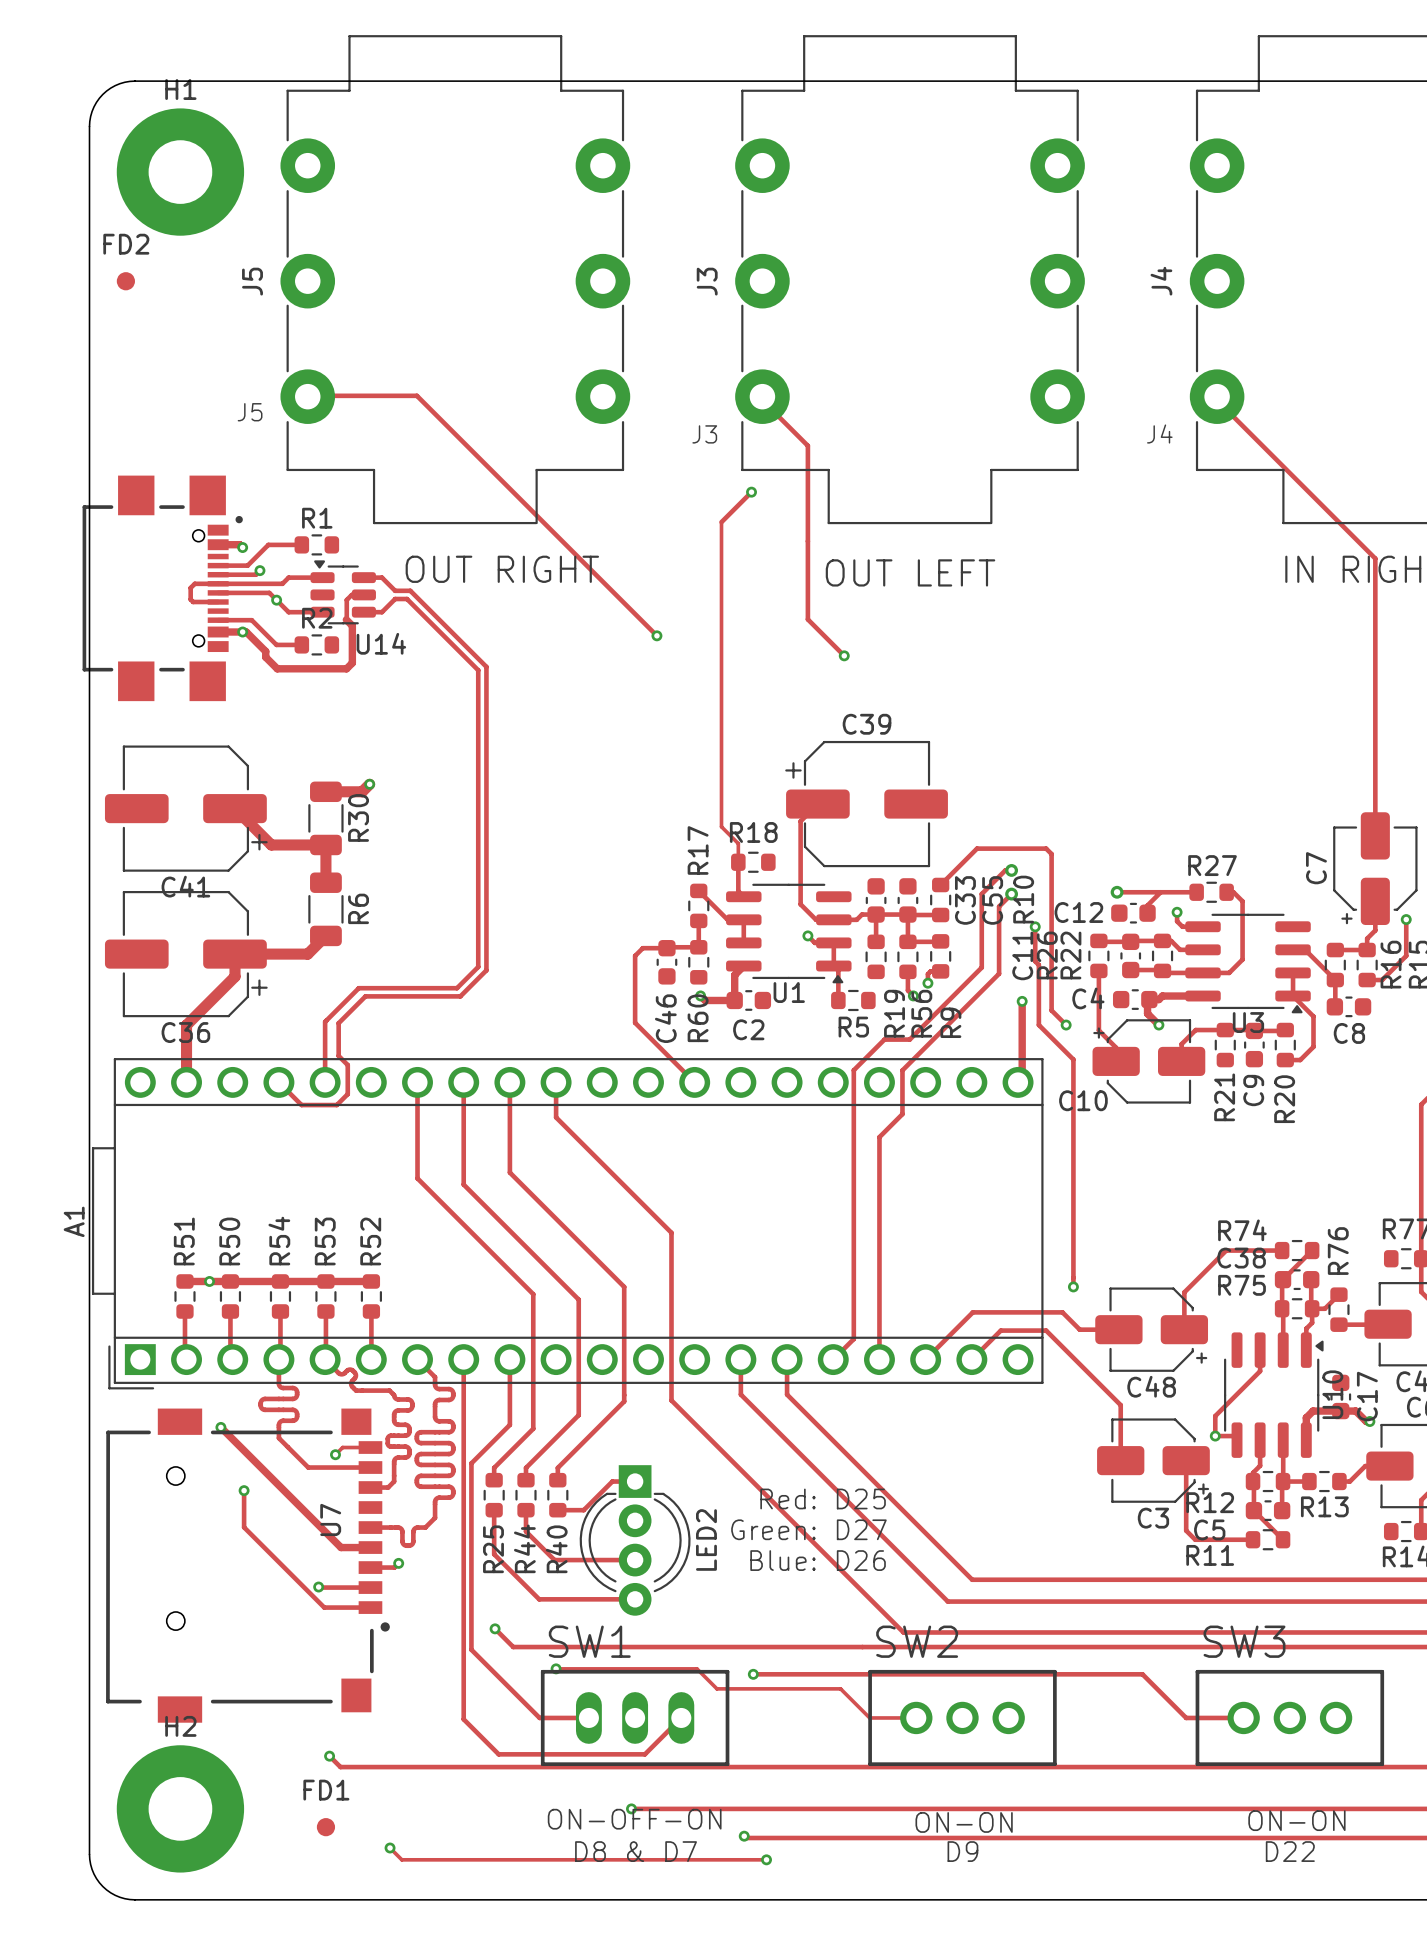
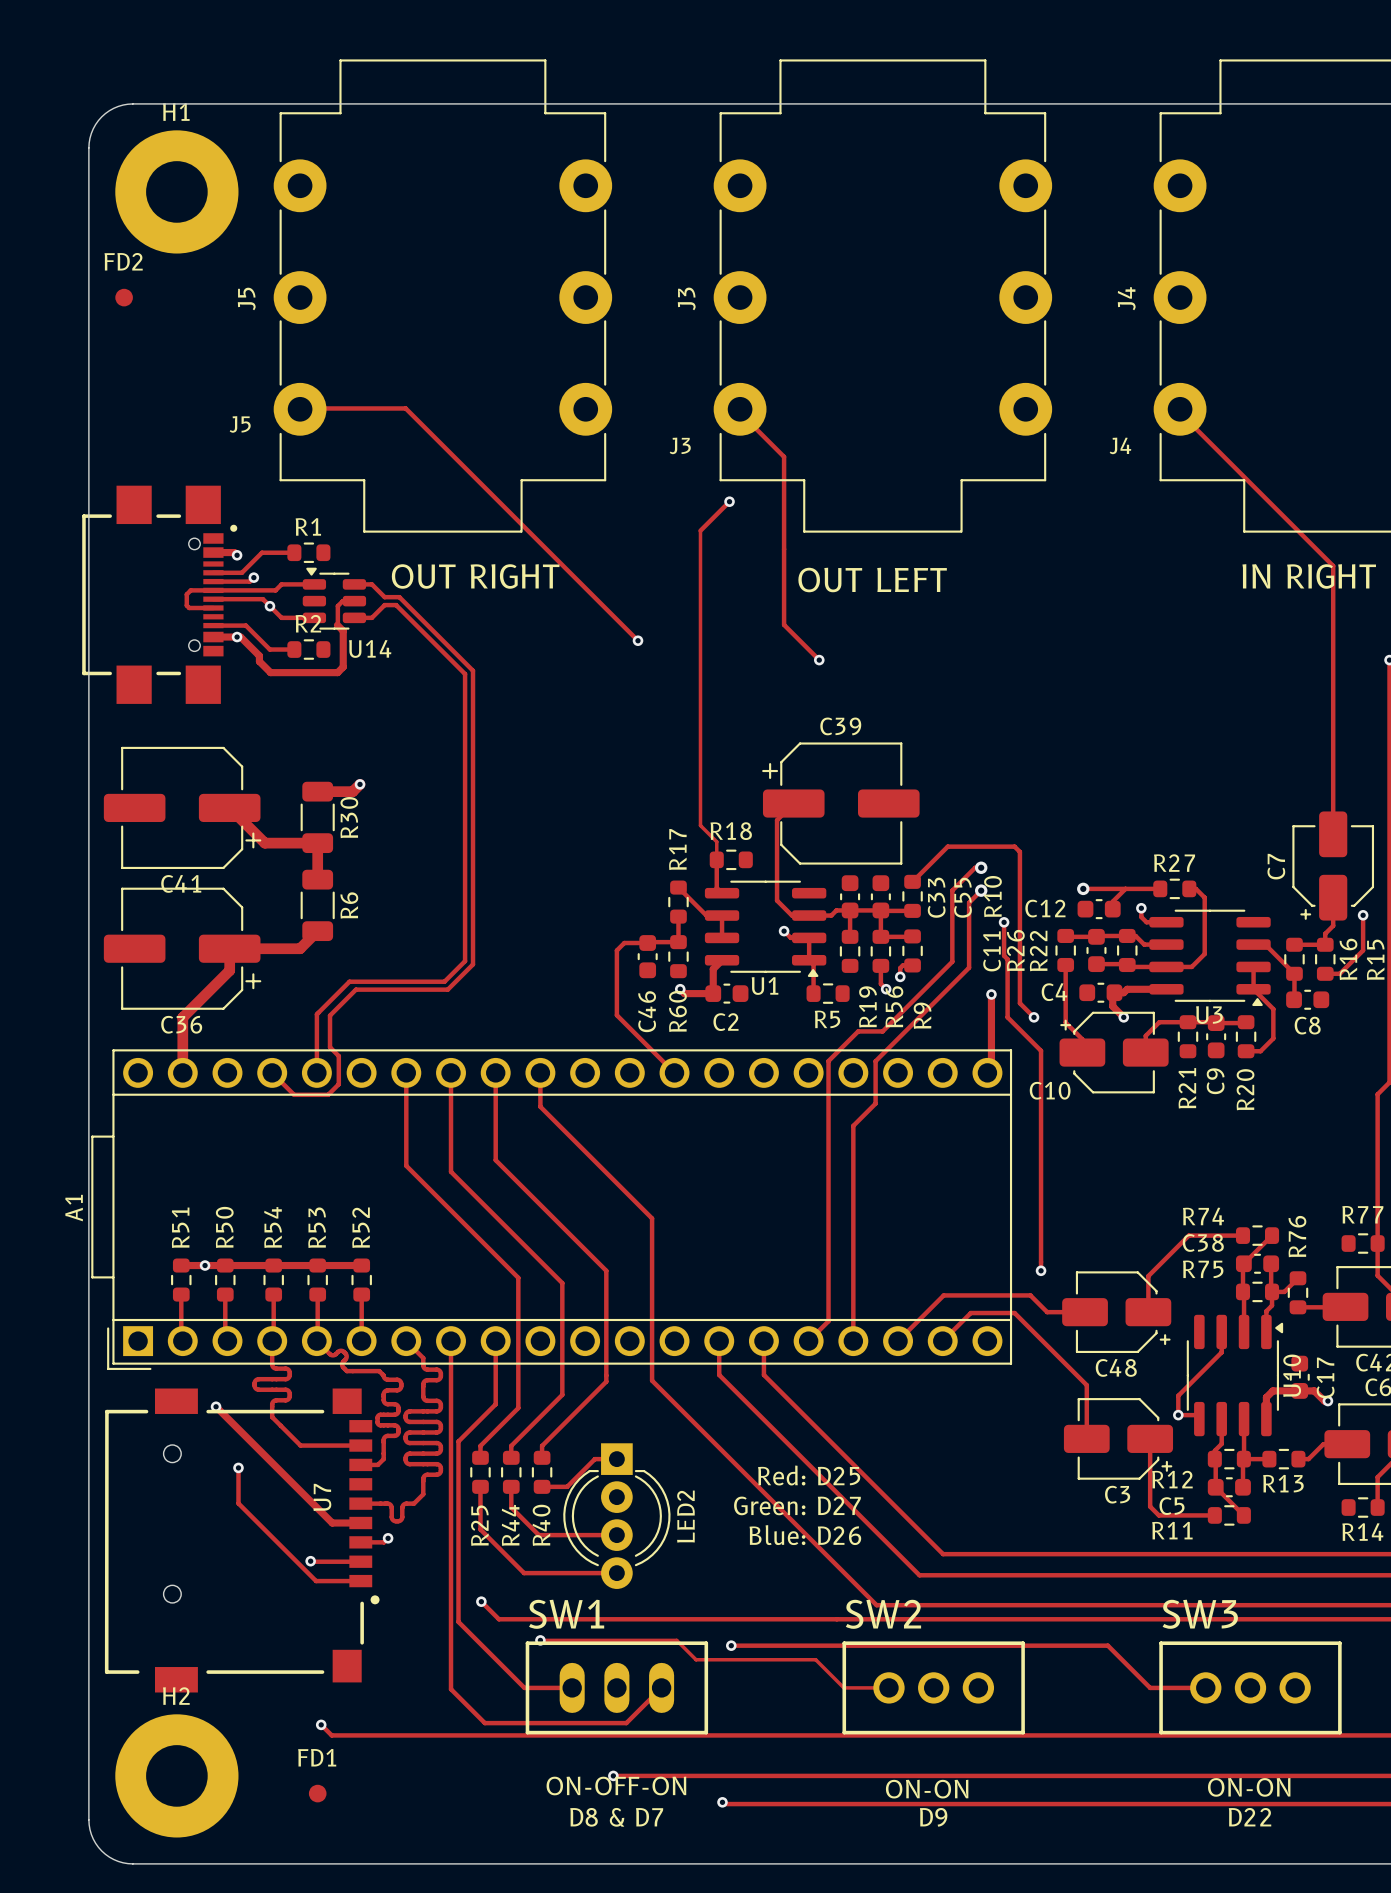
track: (370, 1447) (342, 1447) (335, 1454) -> none
via: (335, 1454) -> none
track: (390, 1848) (401, 1859) (766, 1859) -> none
via: (390, 1848) -> none
via: (766, 1859) -> none

